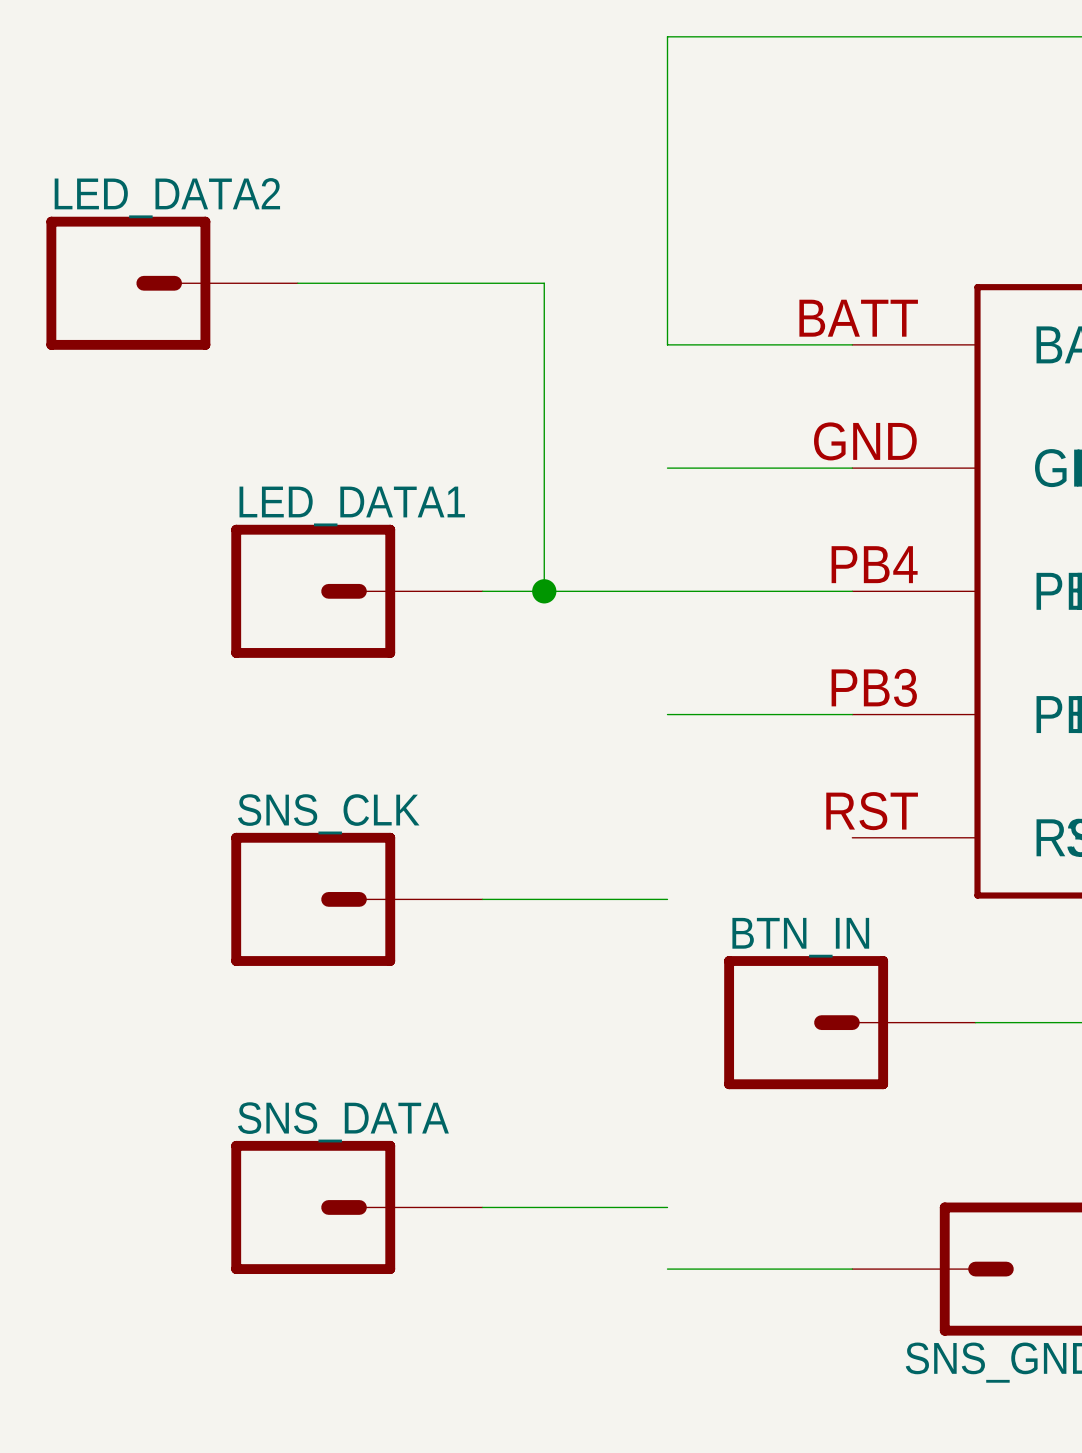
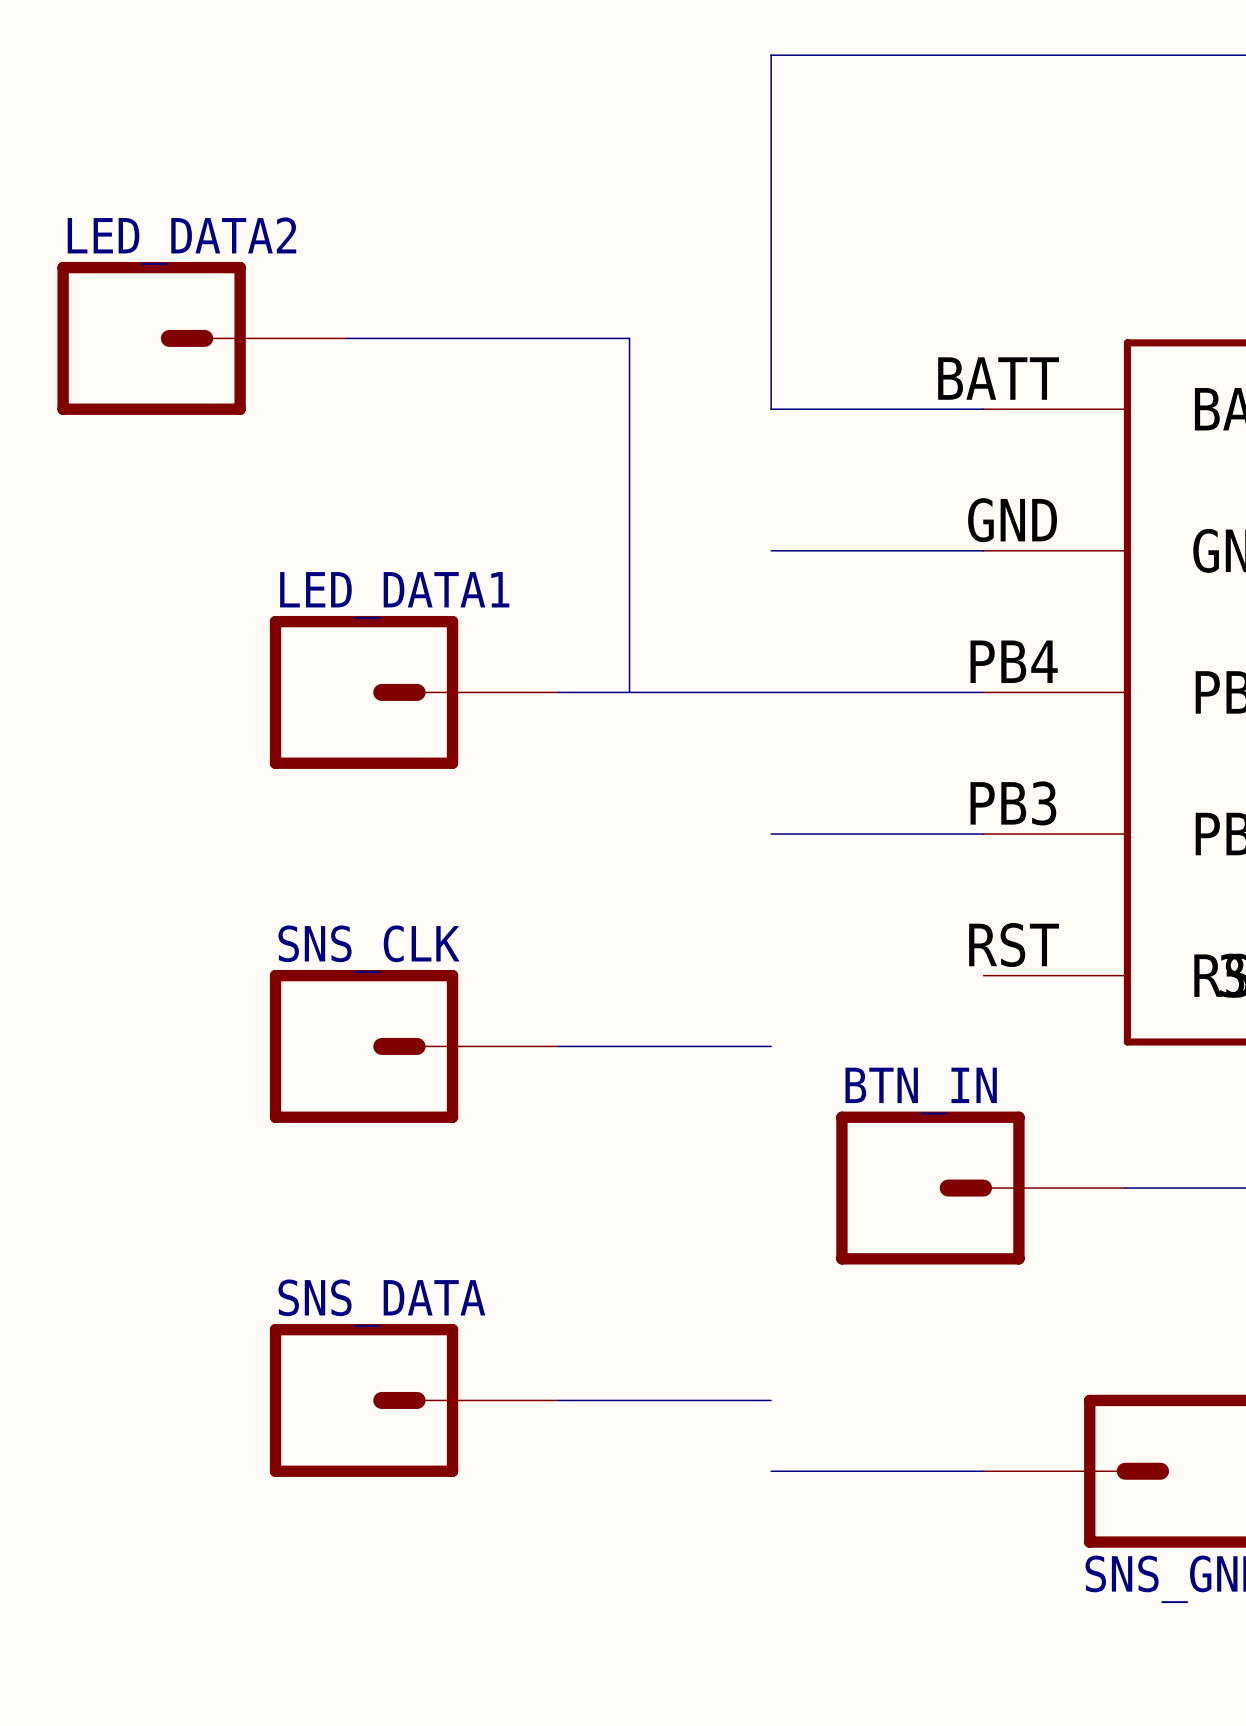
junction: (544, 591) -> none

